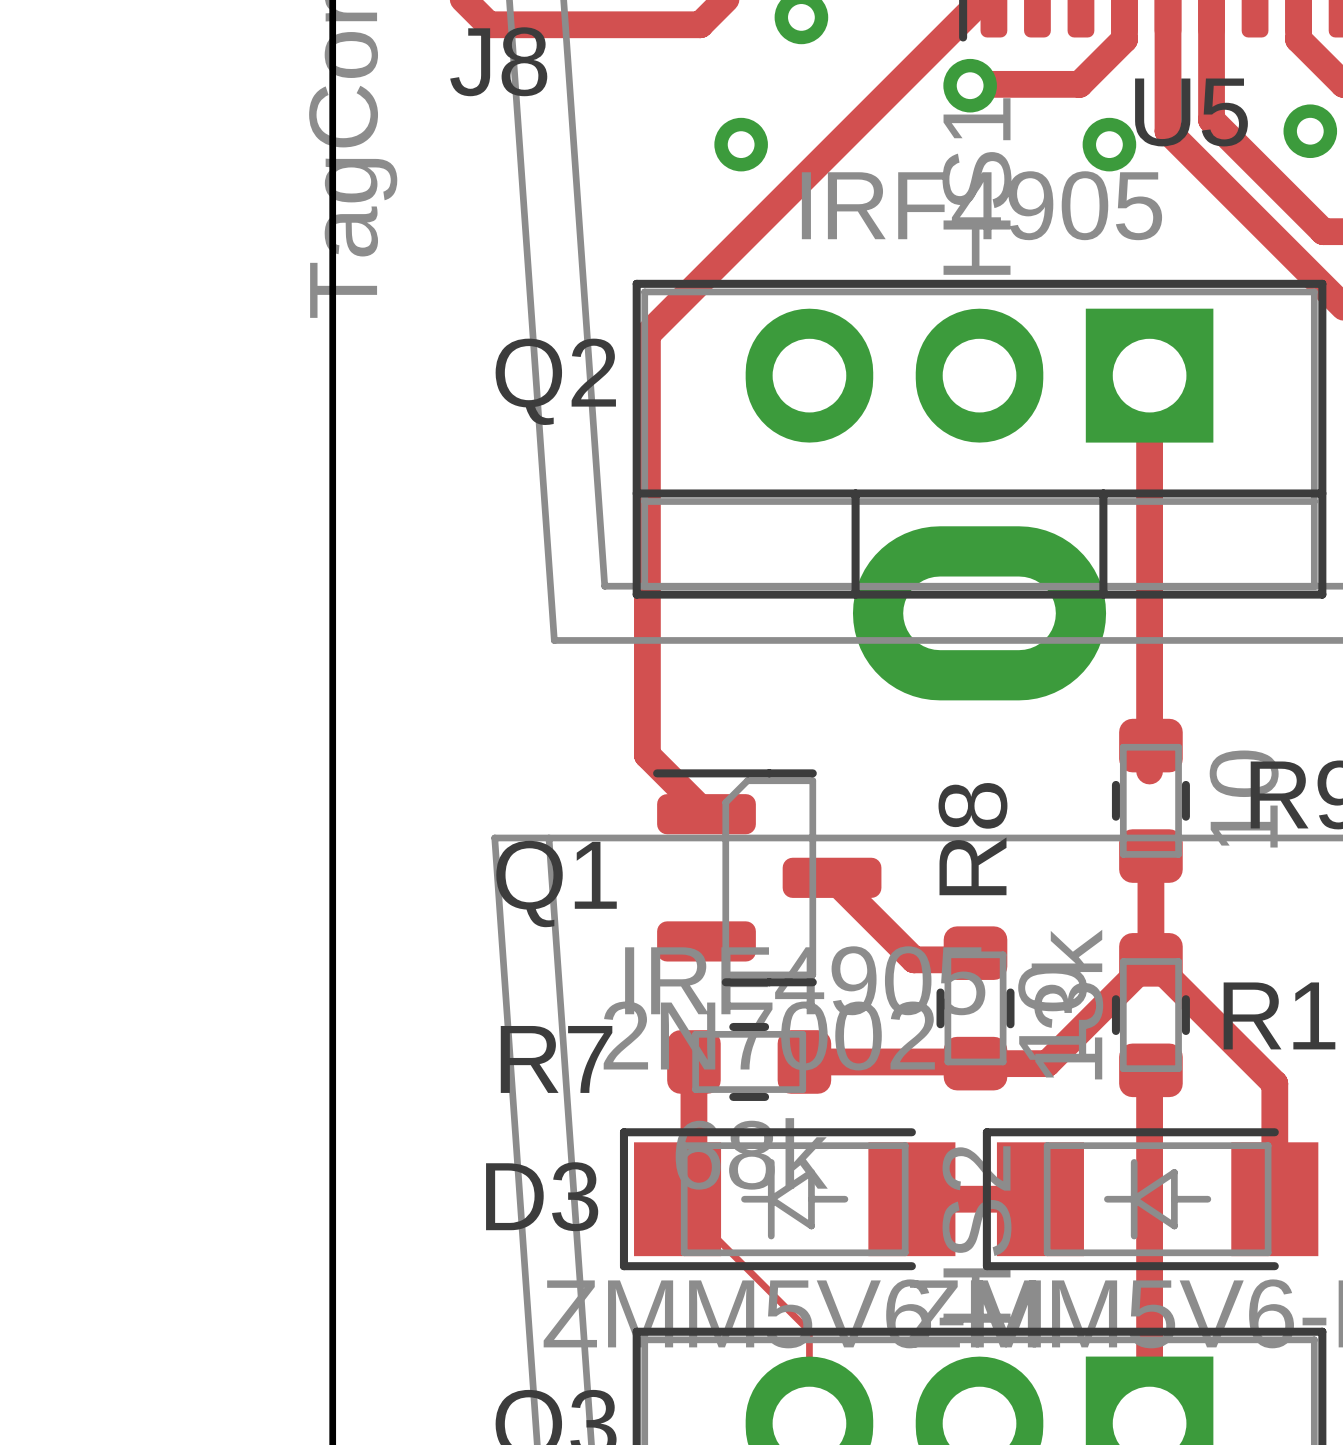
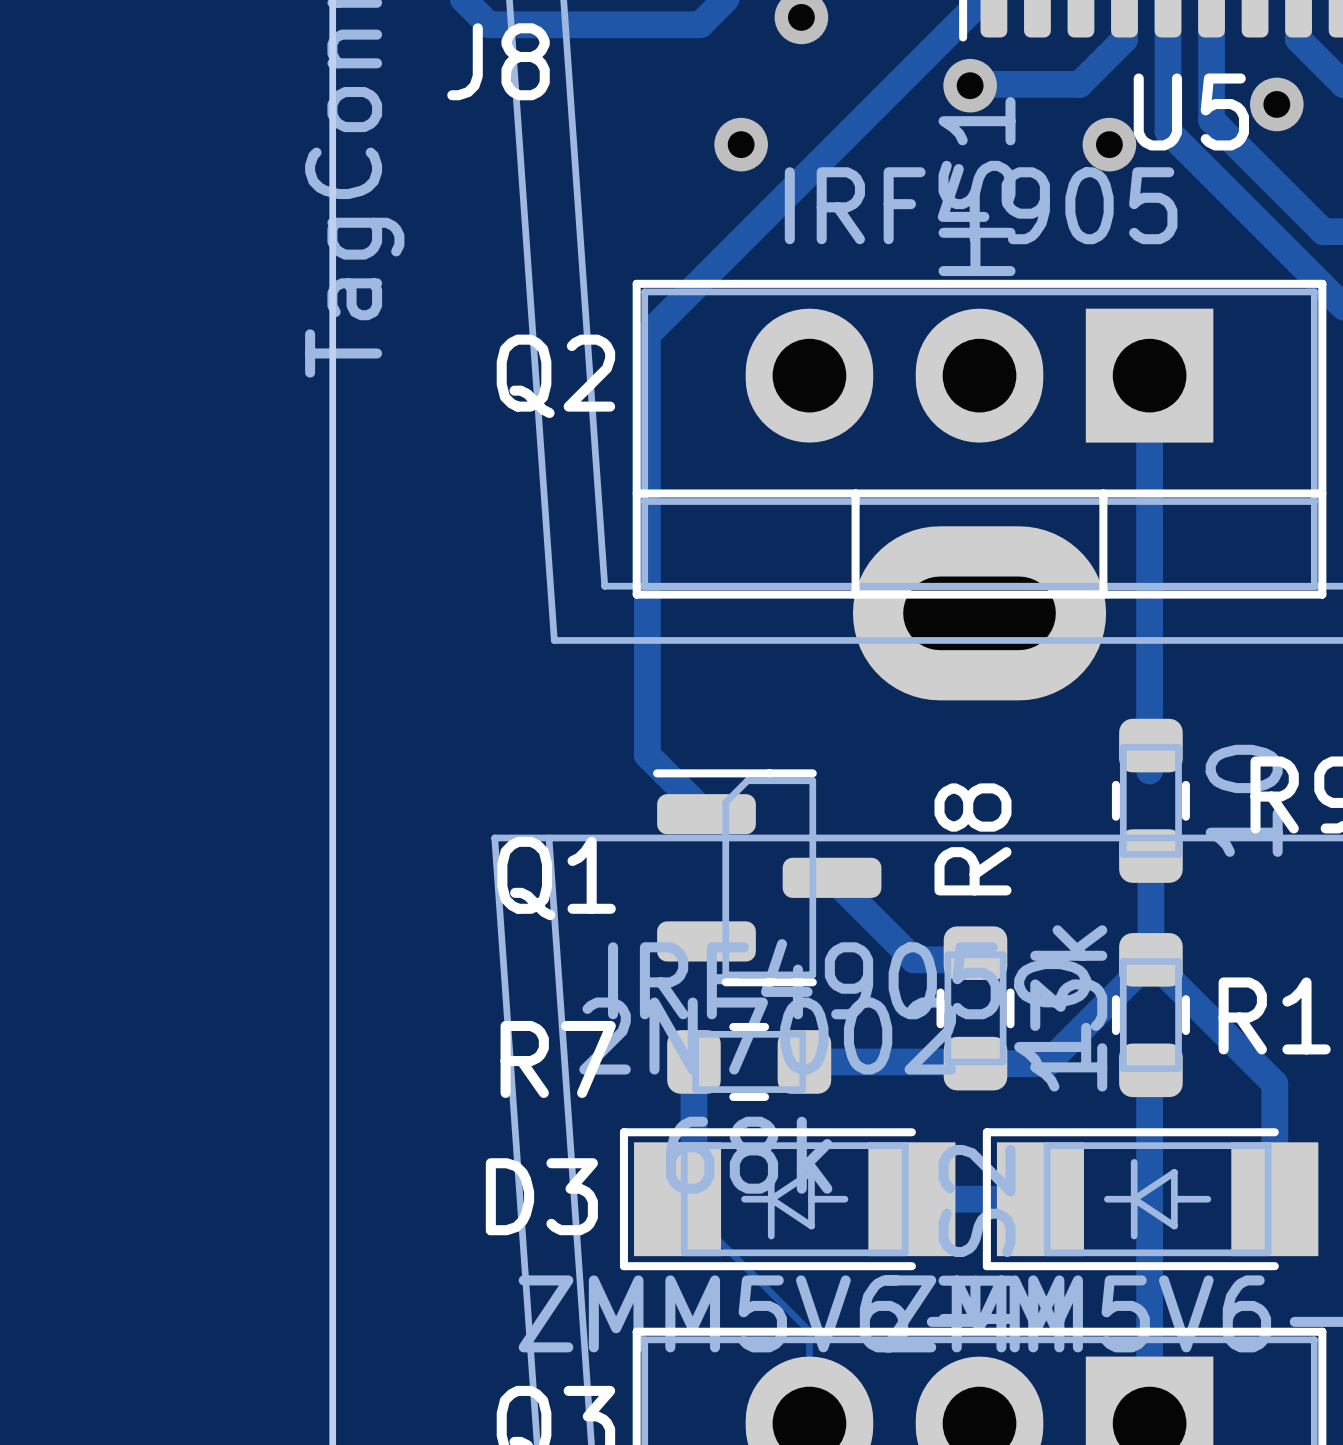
via position: (1310, 131) -> (1276, 104)

